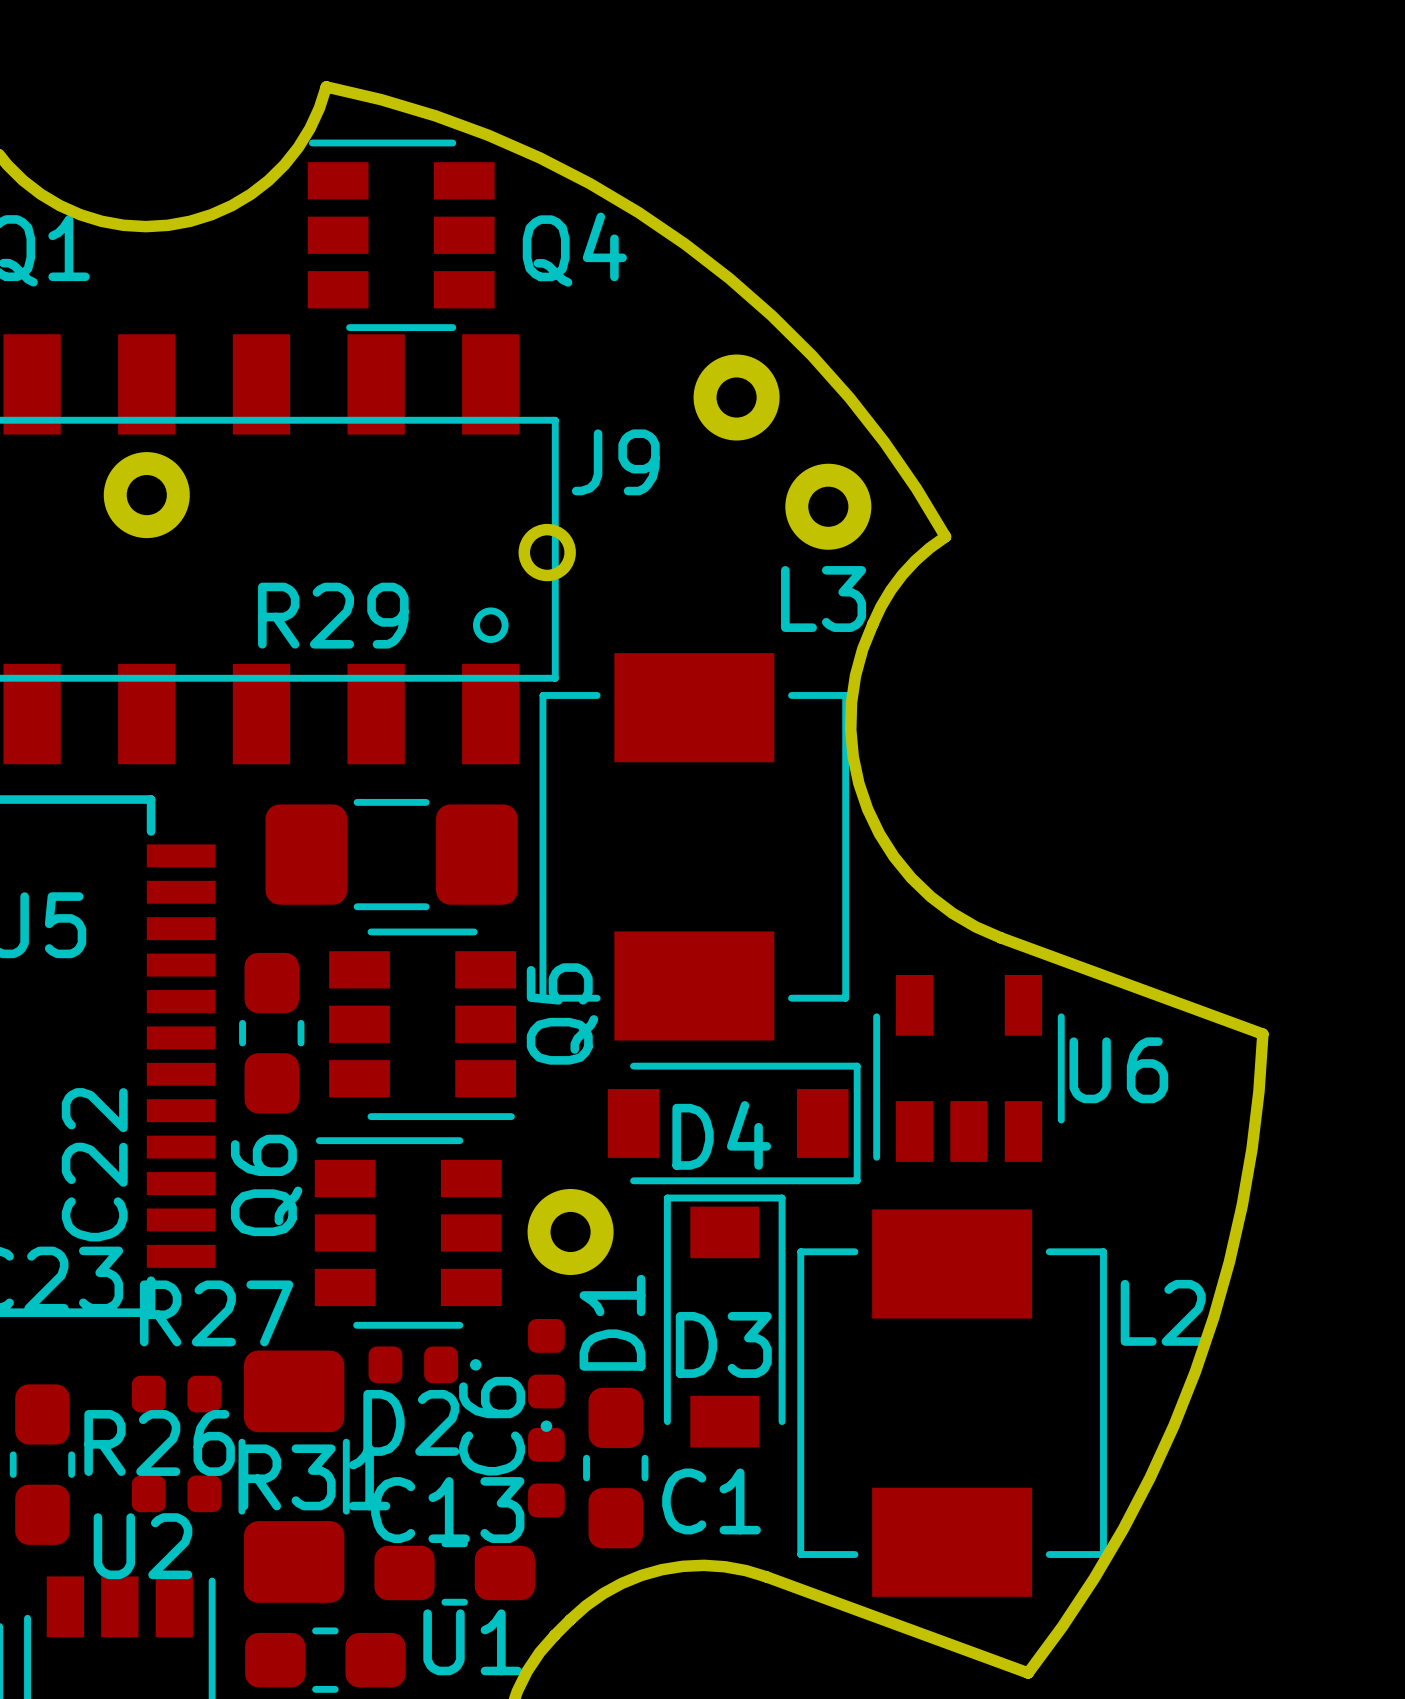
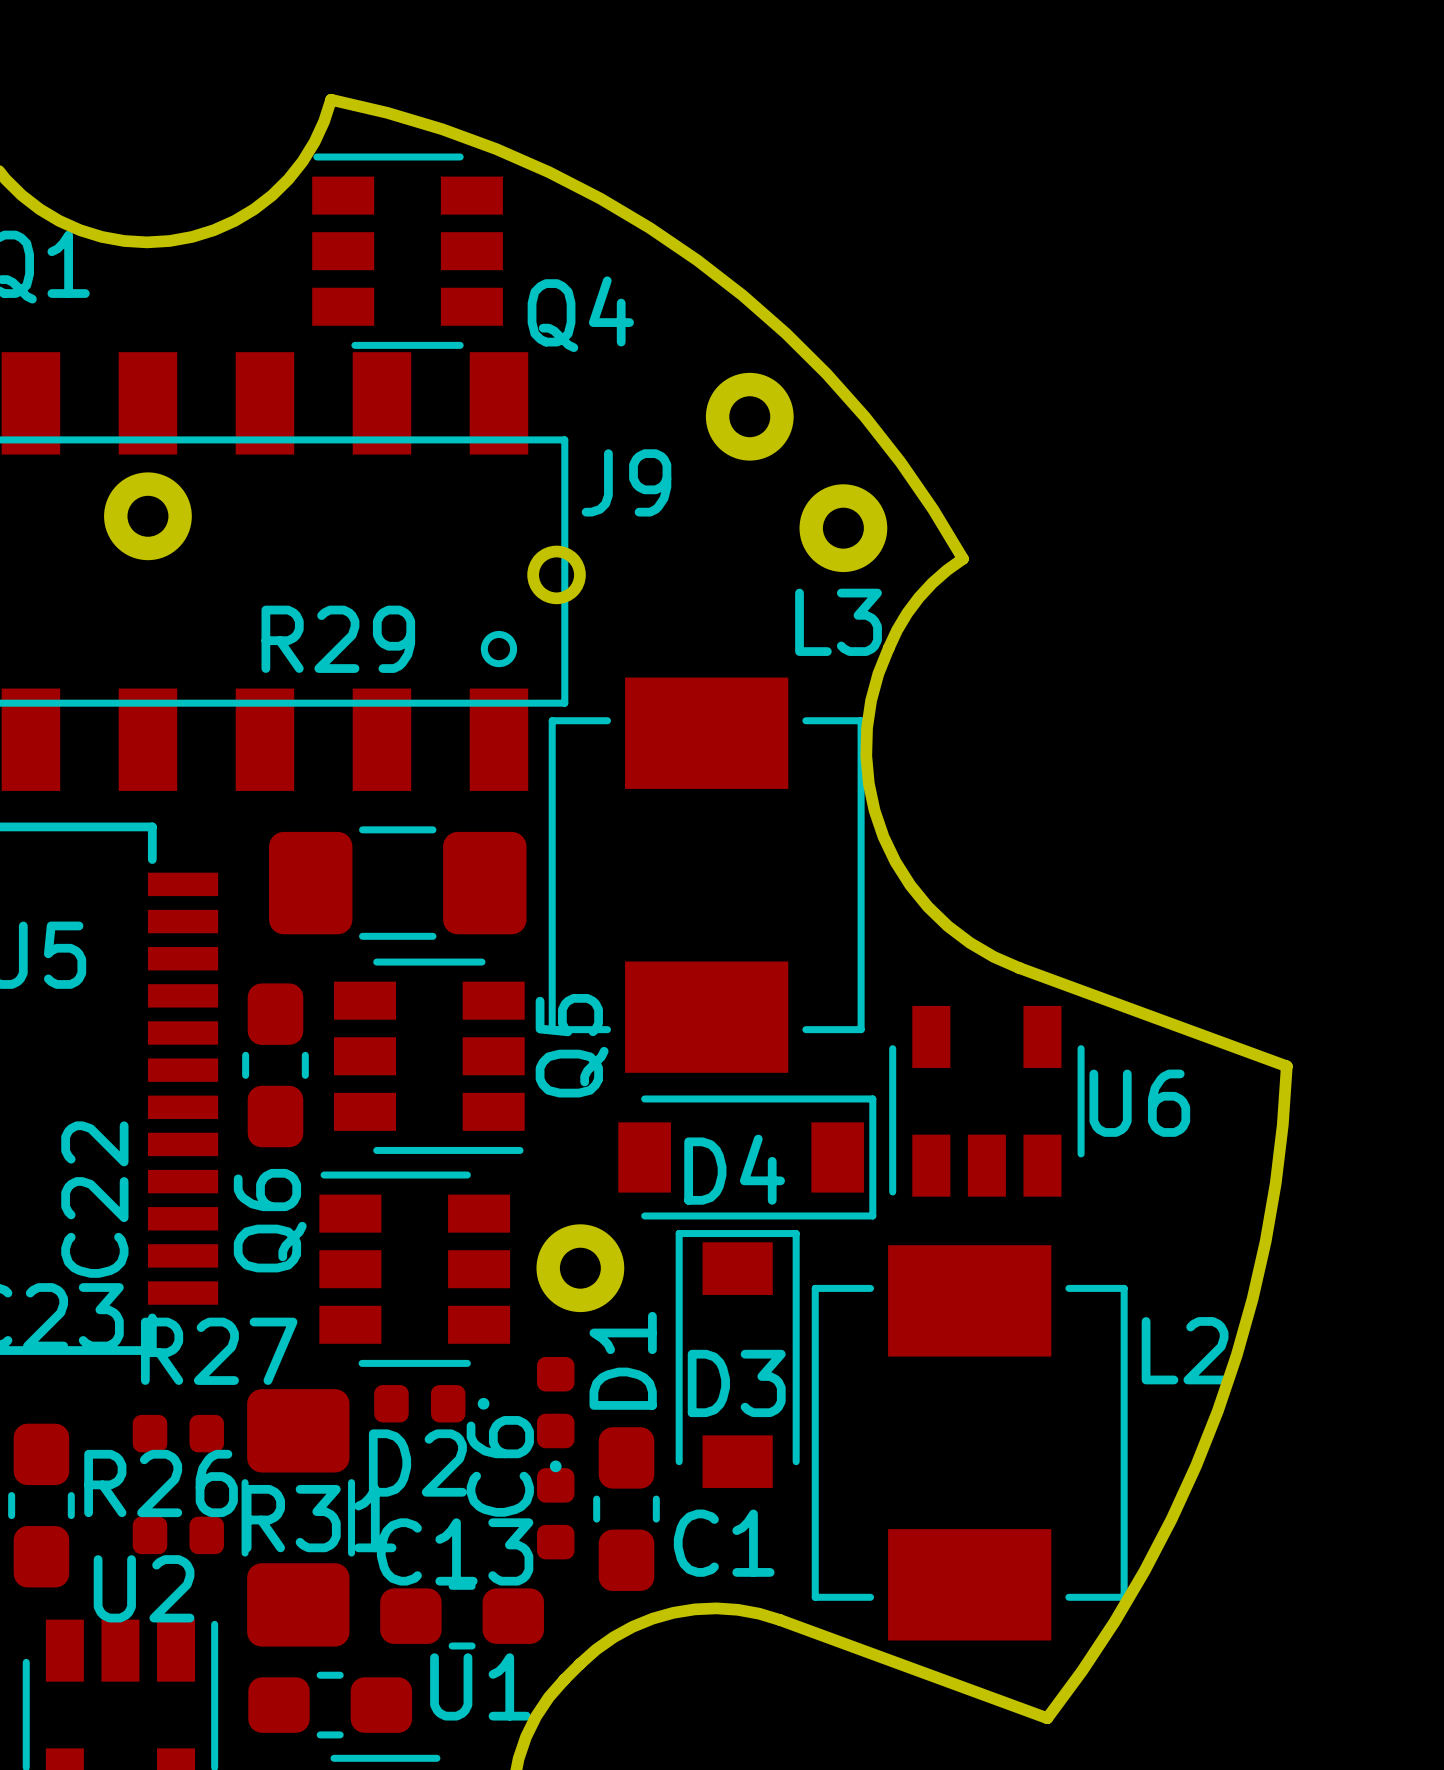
Q4 name position: Q4 (574, 249) -> Q4 (580, 314)

